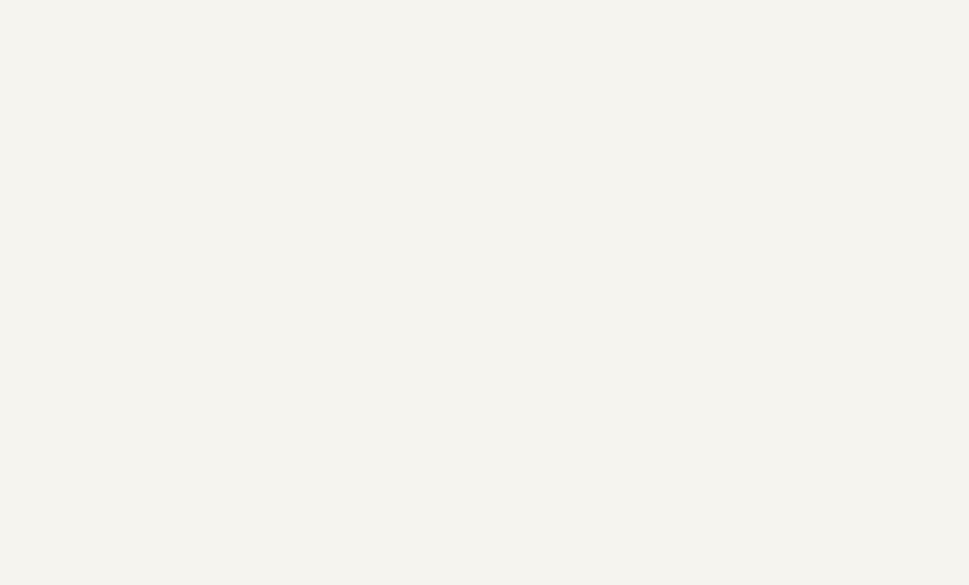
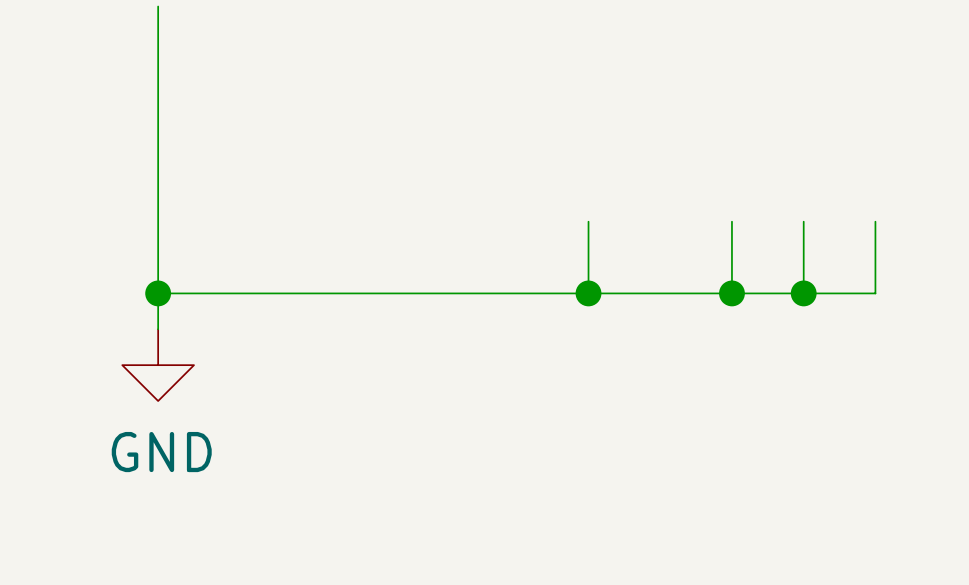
wire: none -> (158, 6) (158, 329)
wire: none -> (588, 221) (588, 293)
wire: none -> (731, 221) (731, 293)
wire: none -> (803, 221) (803, 293)
wire: none -> (875, 221) (875, 293) (158, 293)
junction: none -> (158, 293)
junction: none -> (588, 293)
junction: none -> (731, 293)
junction: none -> (803, 293)
power symbol: none -> GND (158, 365)

